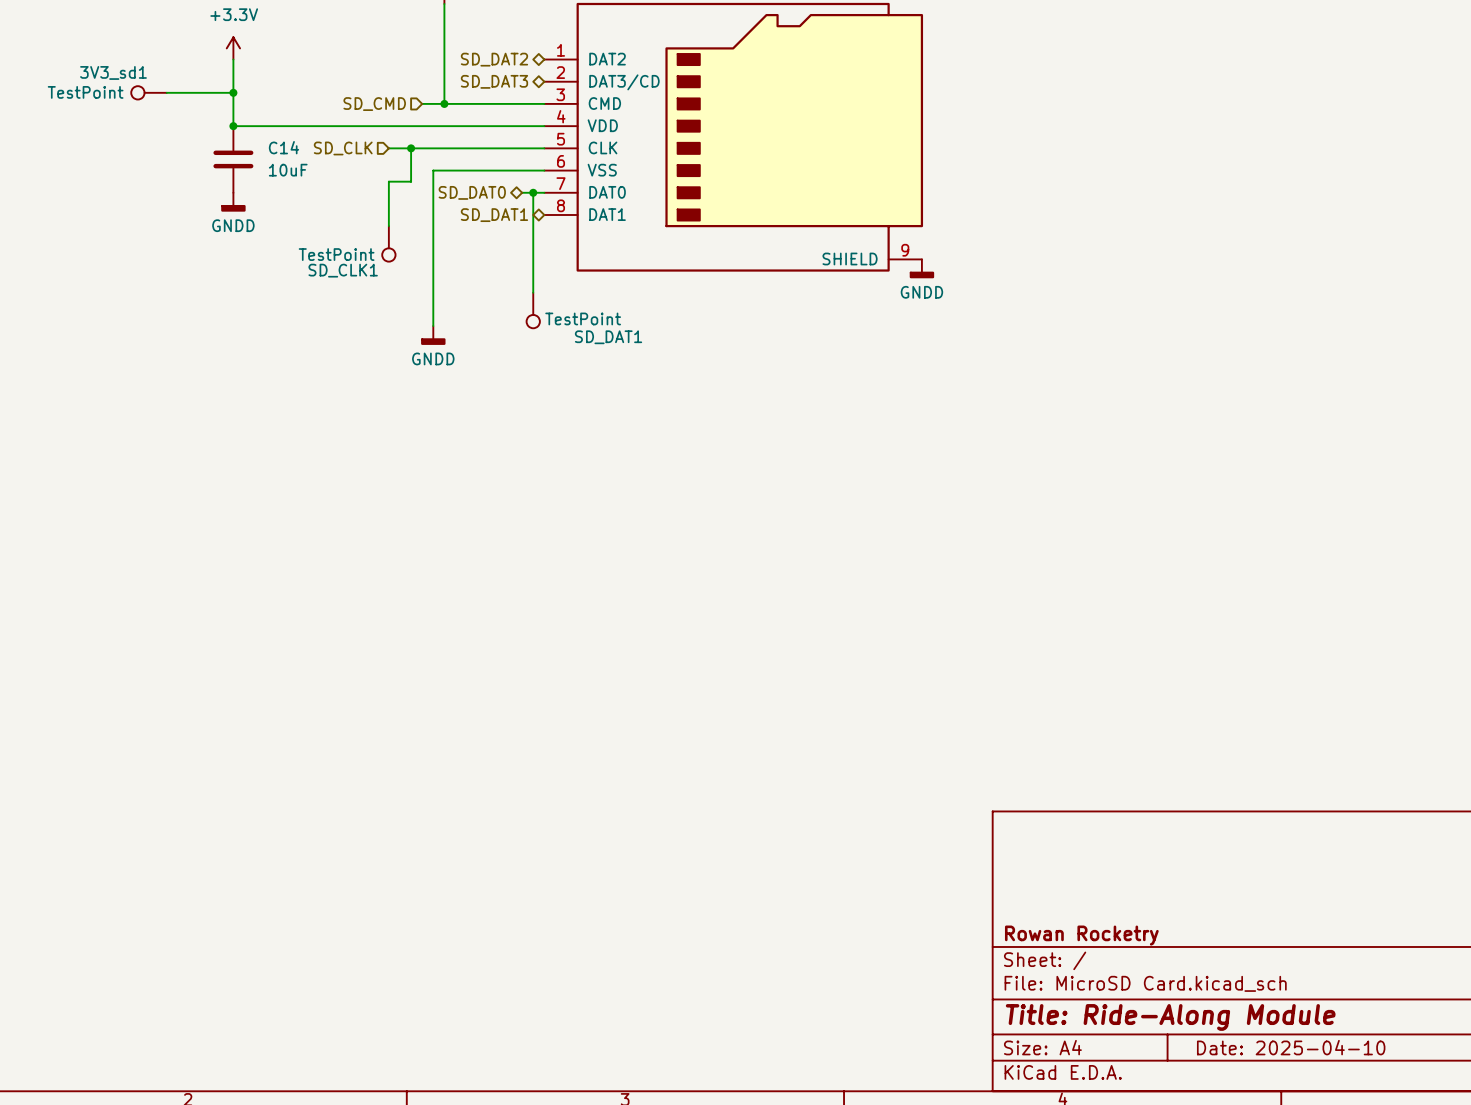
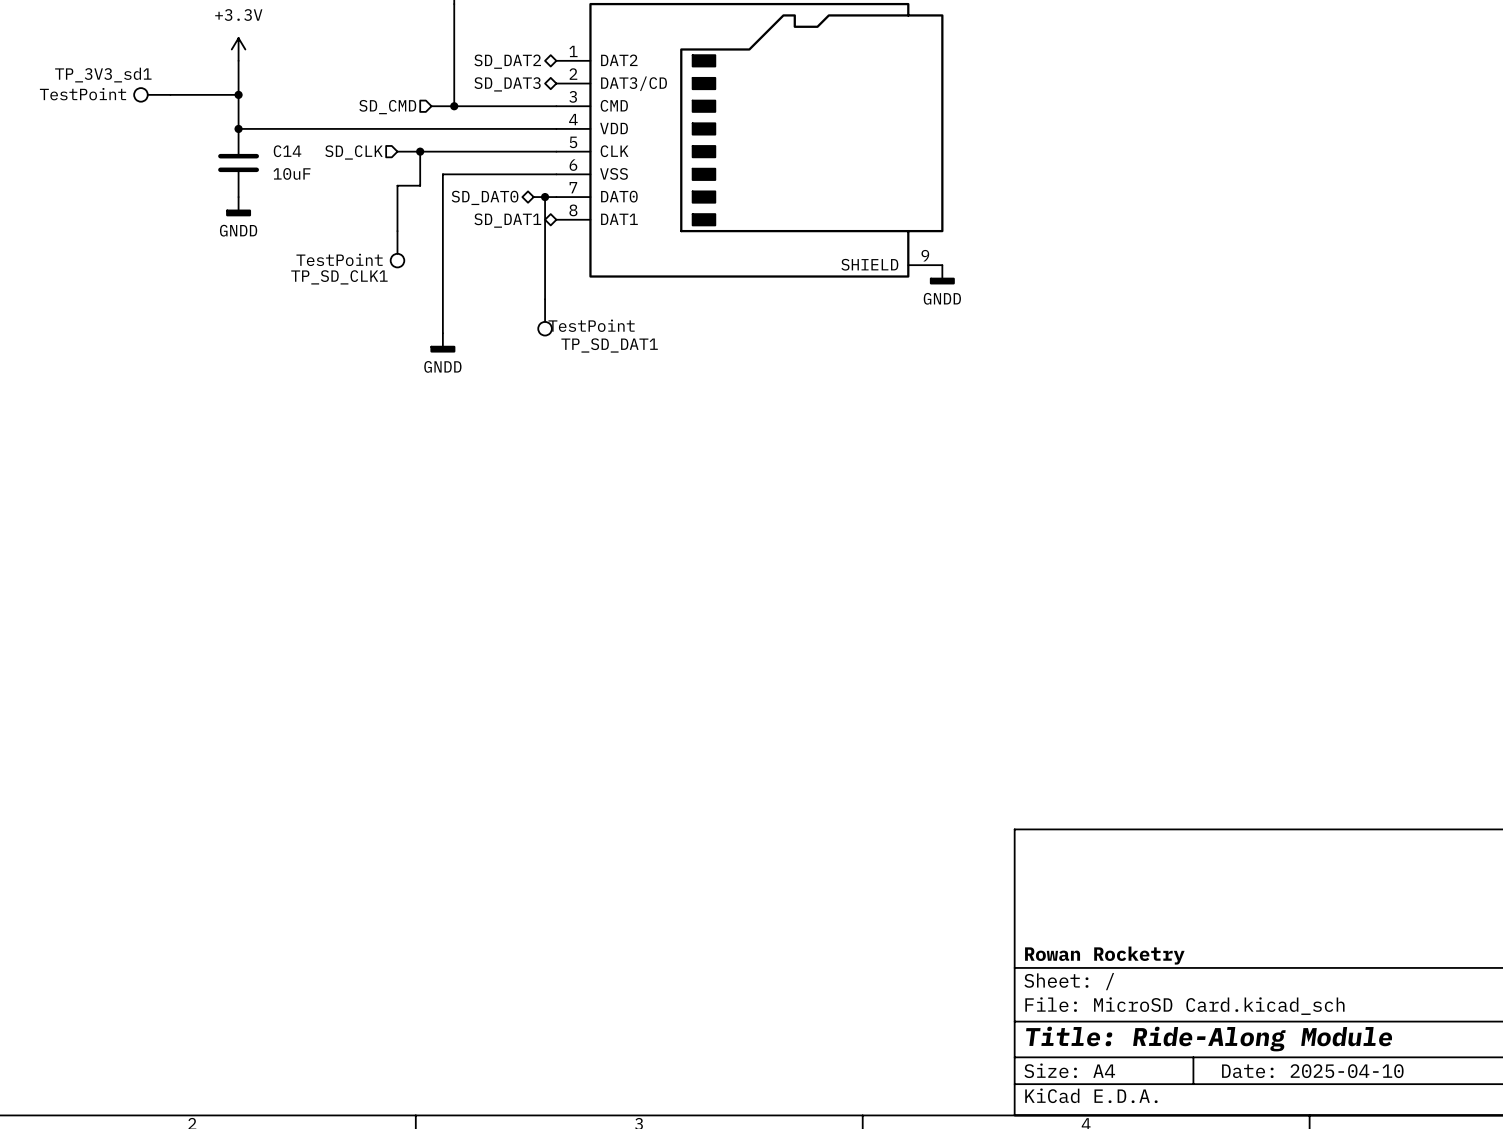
3V3_sd1 name: 3V3_sd1 (113, 72) -> TP_3V3_sd1 (103, 75)
SD_CLK1 name: SD_CLK1 (343, 270) -> TP_SD_CLK1 (339, 277)
SD_DAT1 name: SD_DAT1 (608, 337) -> TP_SD_DAT1 (609, 345)

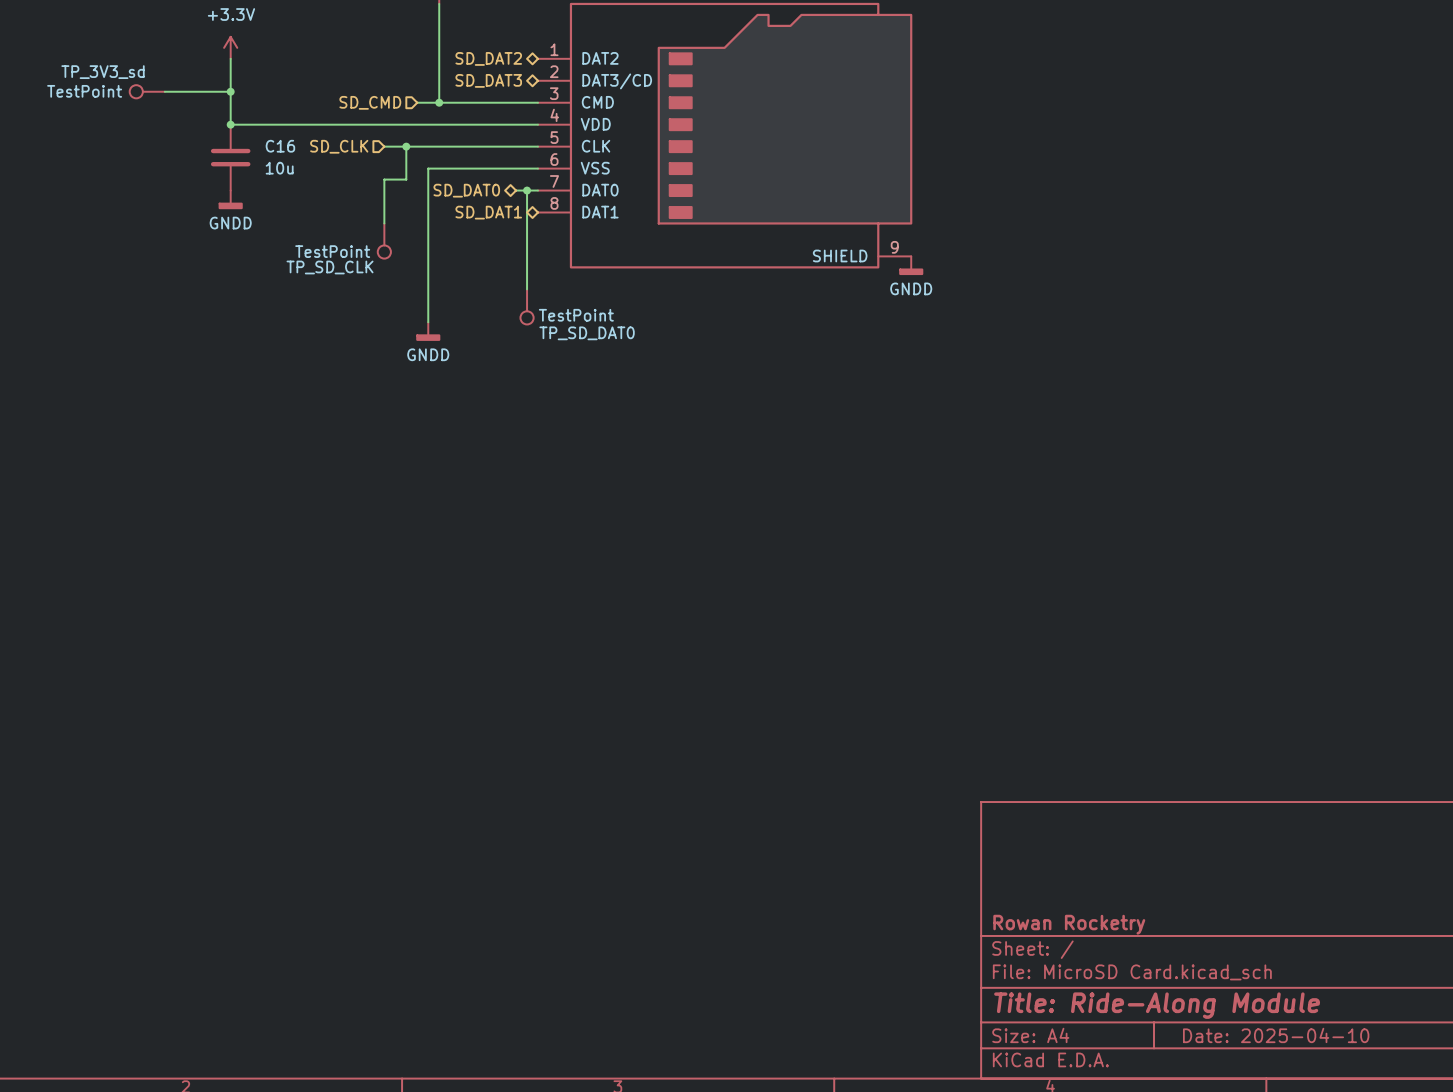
TP_3V3_sd1 name: TP_3V3_sd1 (103, 75) -> TP_3V3_sd (103, 72)
C14 name: C14 (287, 151) -> C16 (280, 146)
C14 value: 10uF (292, 173) -> 10u (279, 168)
TP_SD_CLK1 name: TP_SD_CLK1 (339, 277) -> TP_SD_CLK (330, 267)
TP_SD_DAT1 name: TP_SD_DAT1 (609, 345) -> TP_SD_DAT0 (587, 333)

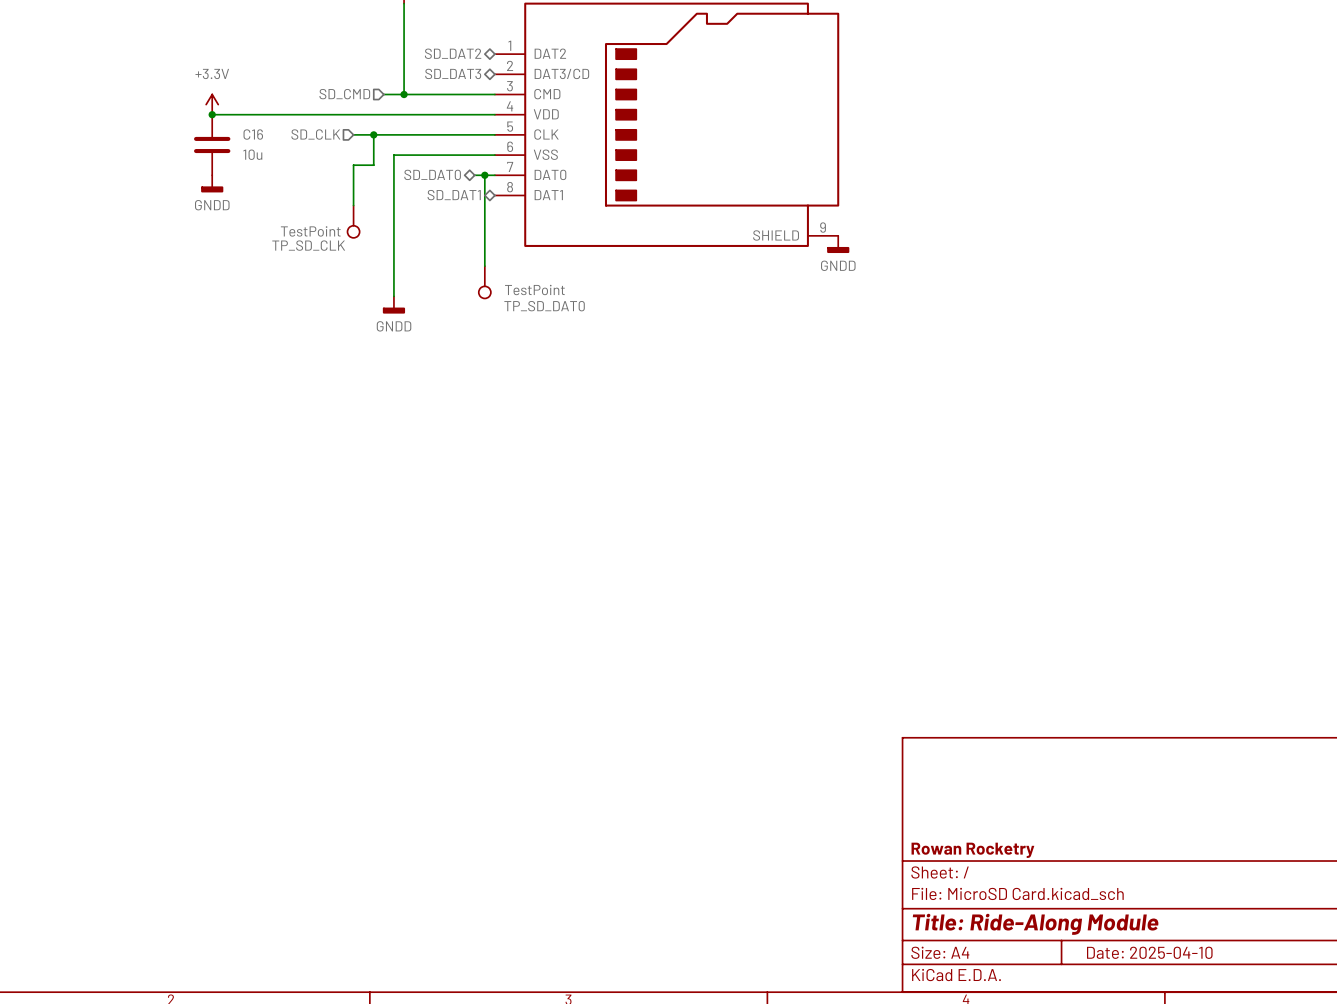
power symbol position: +3.3V (230, 47) -> +3.3V (212, 104)
wire: (230, 58) (230, 124) -> none
TP_3V3_sd: TestPoint (147, 91) -> none
wire: (164, 91) (230, 91) -> none
junction: (230, 91) -> none

